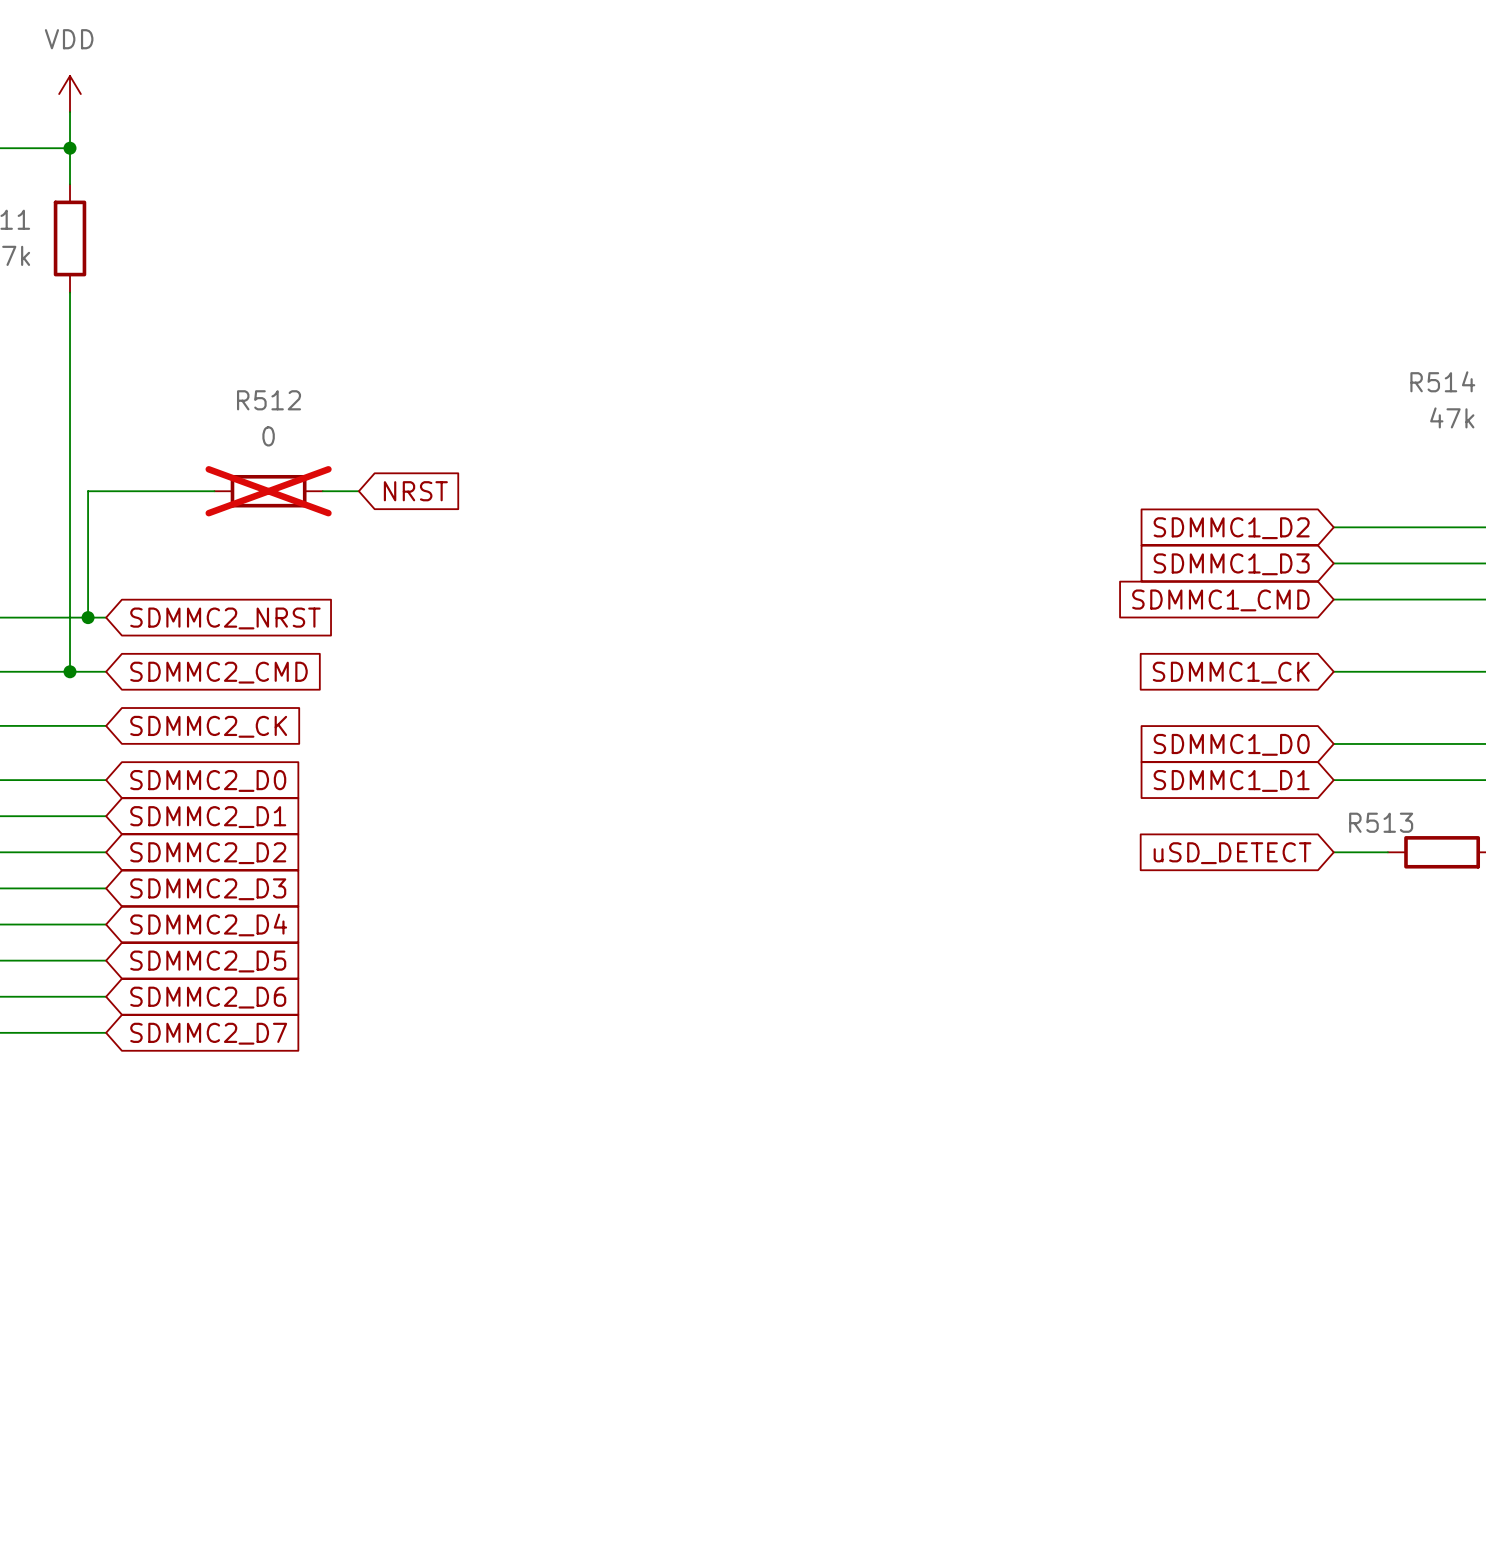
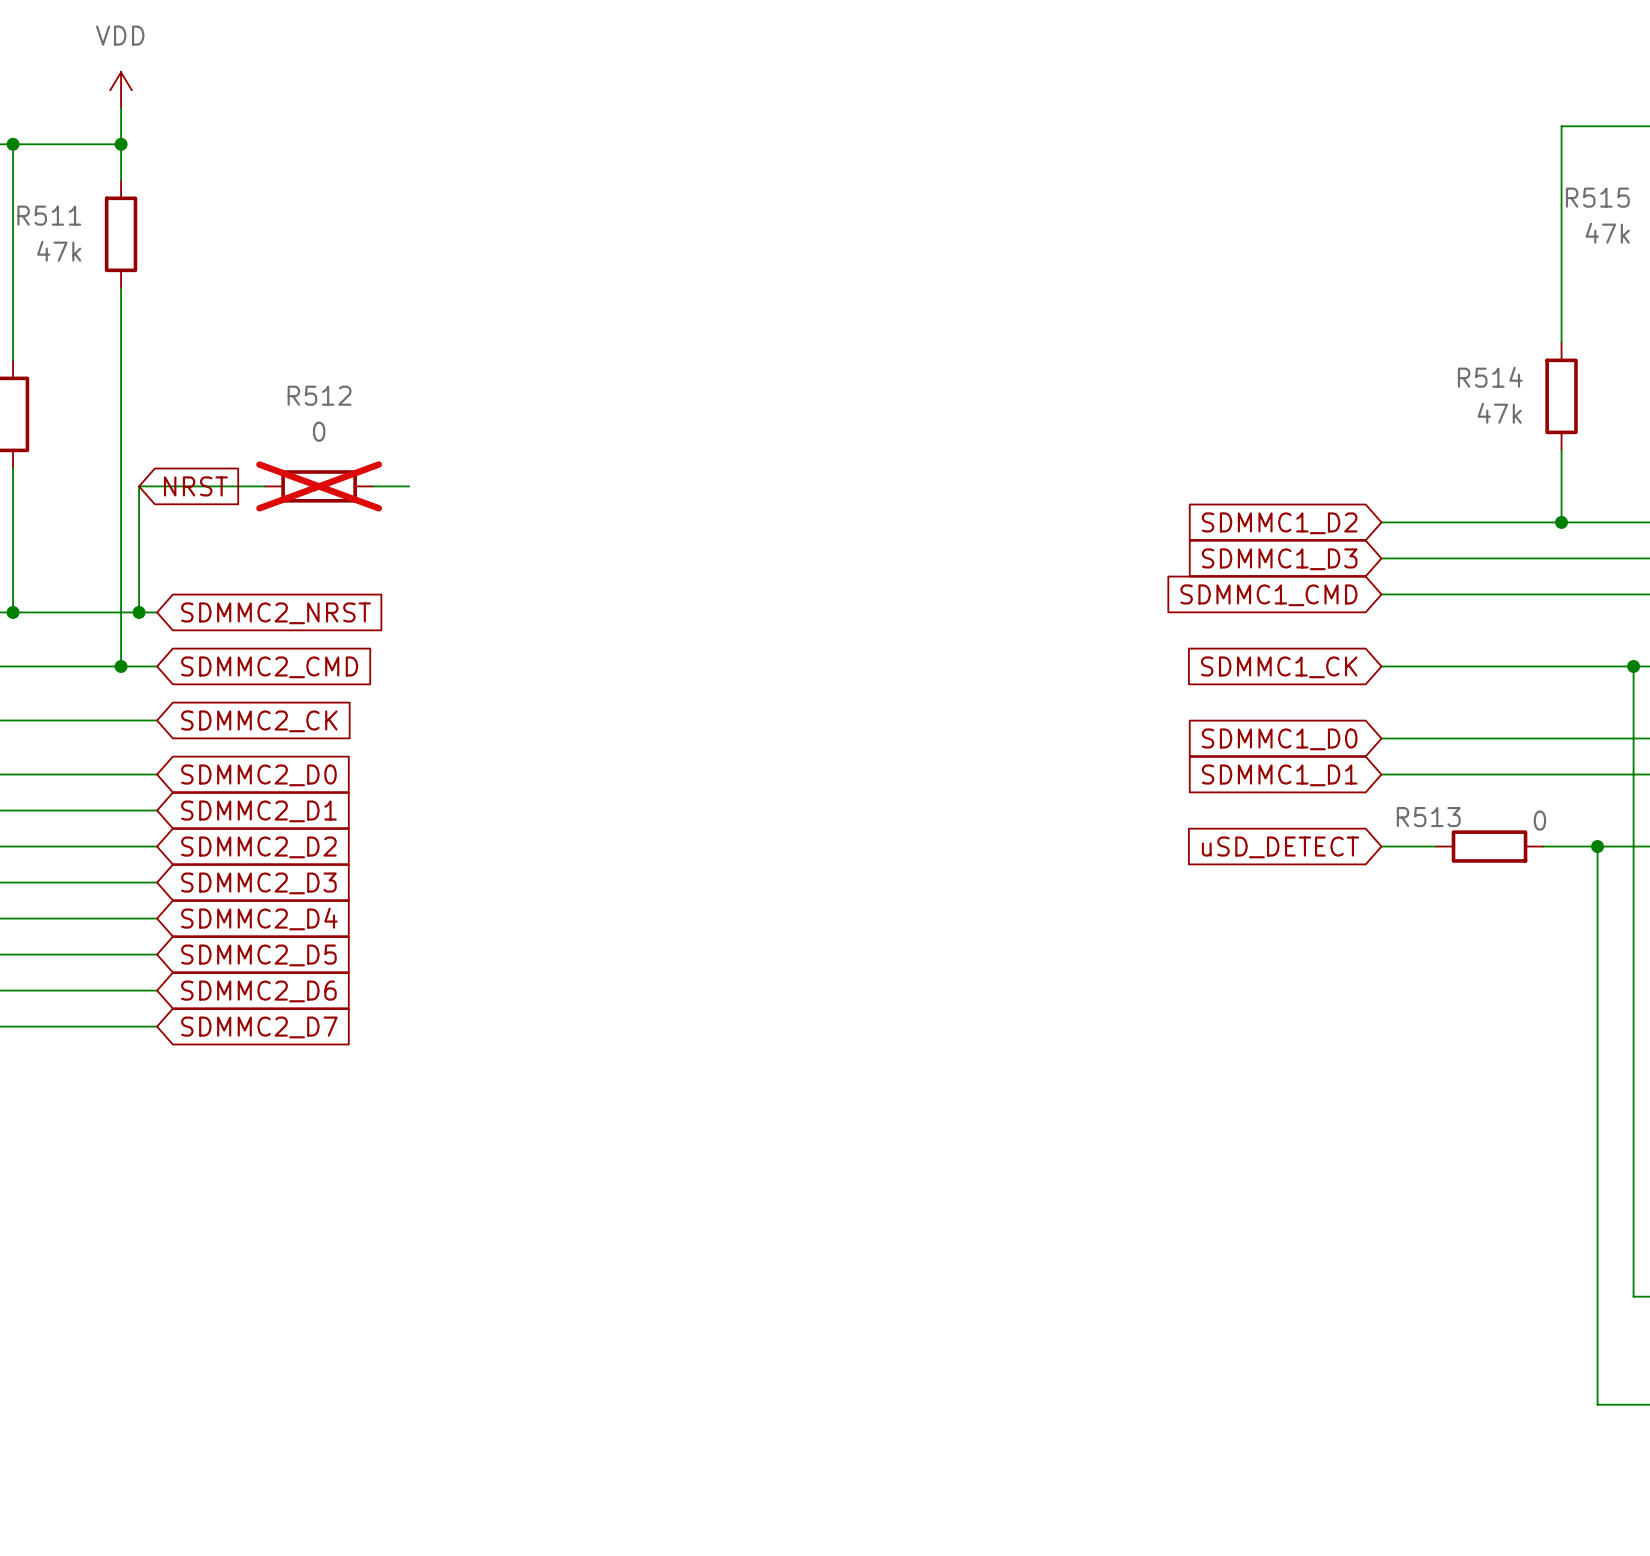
global label position: NRST (415, 491) -> NRST (195, 486)

